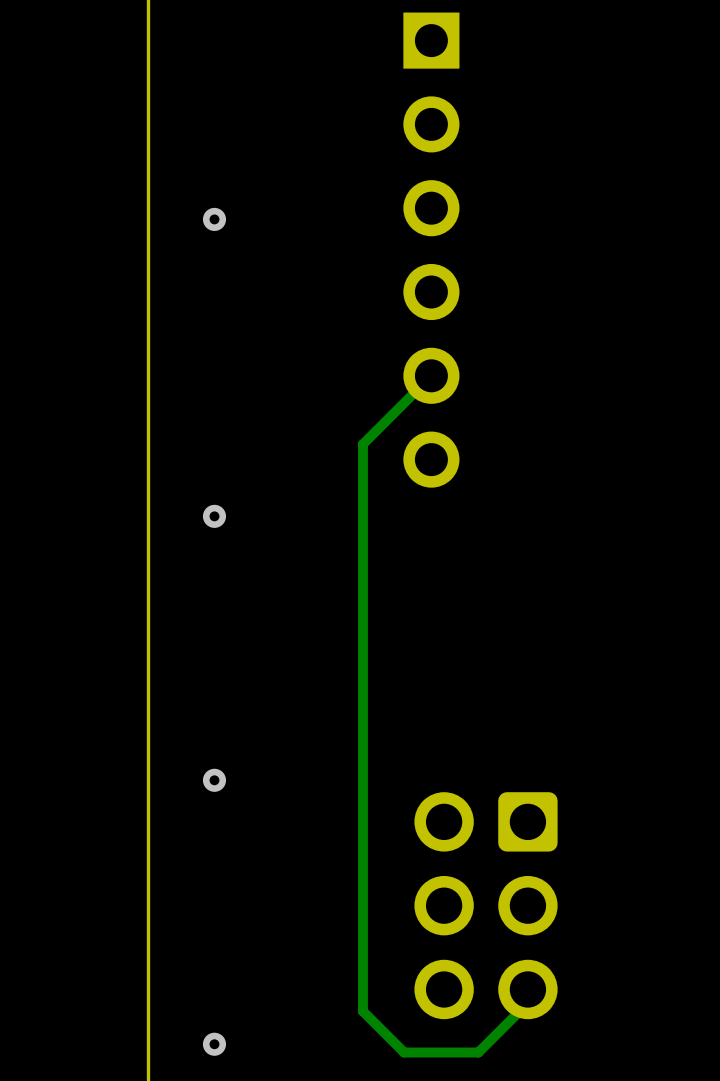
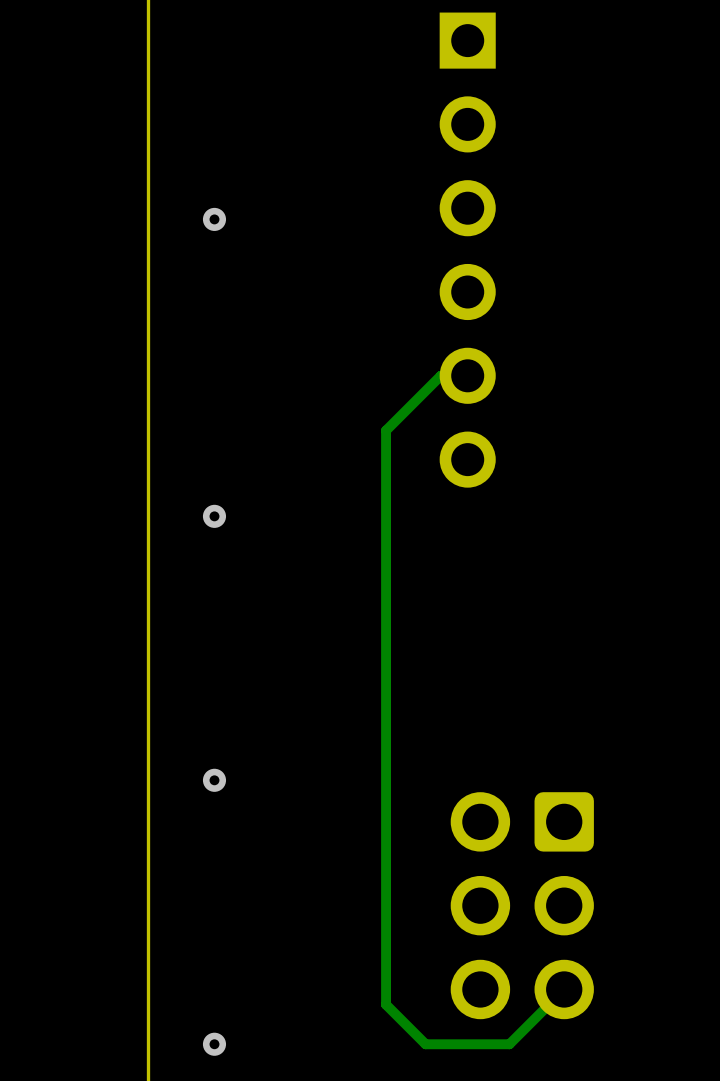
part position: (431, 250) -> (467, 250)
track: (431, 375) (362, 444) (362, 1011) (404, 1052) (478, 1052) (527, 1003) (527, 989) -> none
track: none -> (467, 375) (440, 375) (386, 430) (386, 1004) (425, 1044) (509, 1044) (564, 989)
part position: (486, 905) -> (522, 905)

